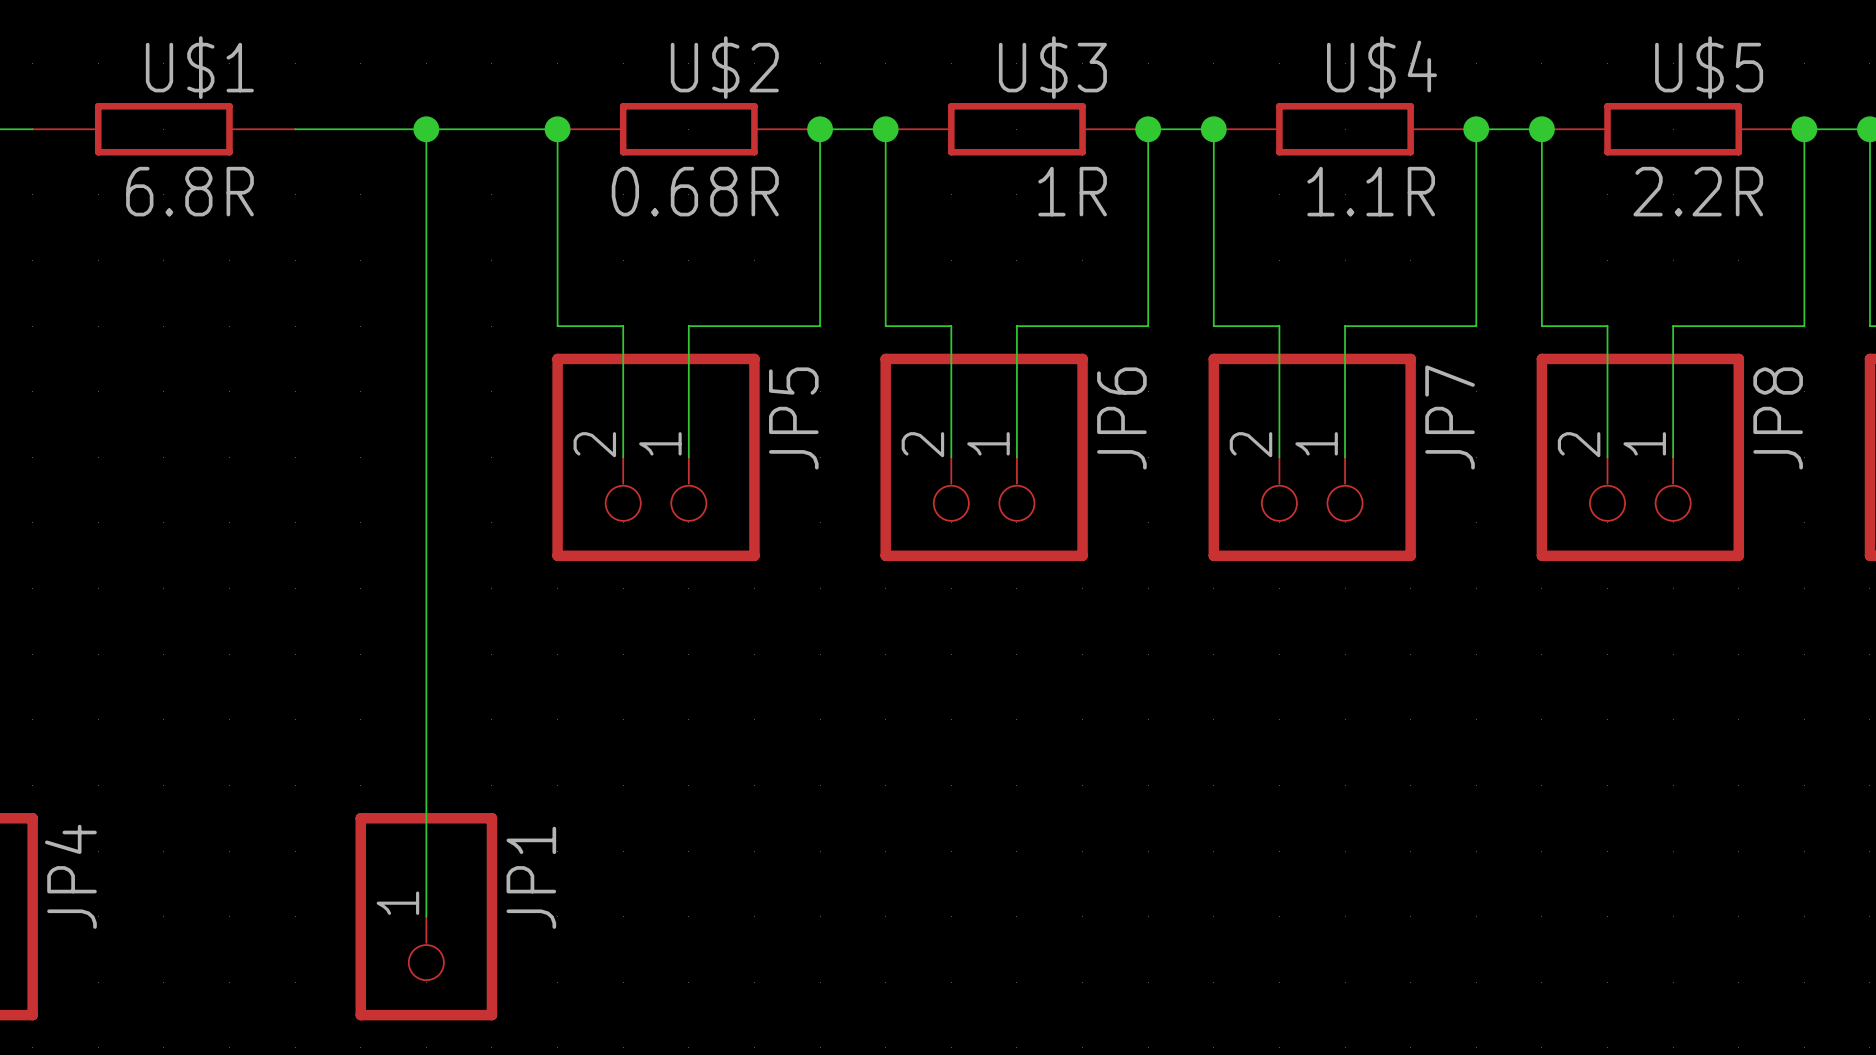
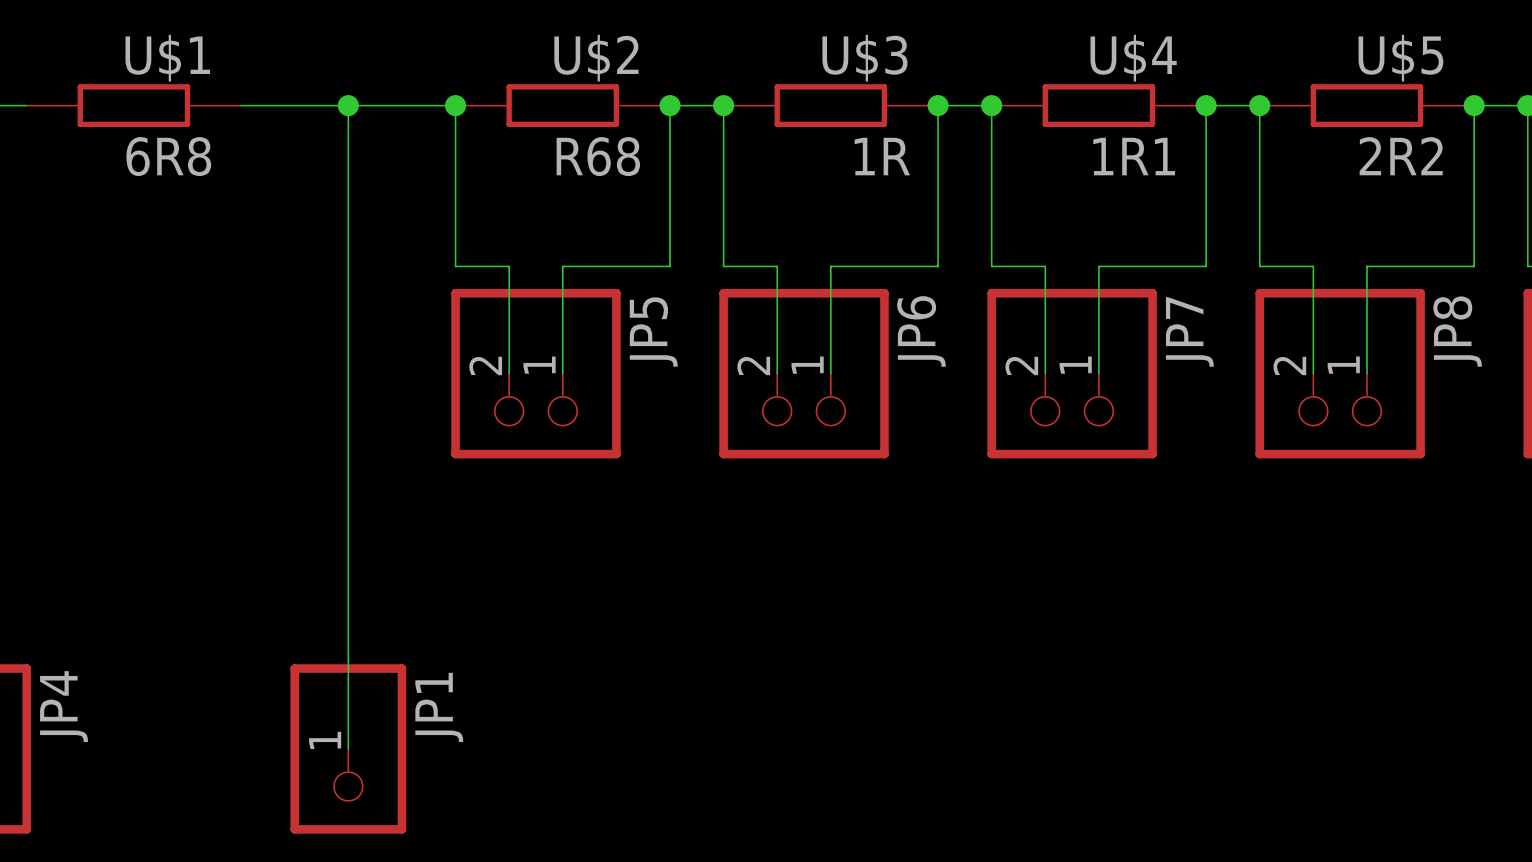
U$1 value: 6.8R (190, 191) -> 6R8 (168, 156)
U$2 value: 0.68R (695, 191) -> R68 (598, 156)
U$4 value: 1.1R (1371, 191) -> 1R1 (1134, 156)
U$5 value: 2.2R (1698, 191) -> 2R2 (1401, 156)

